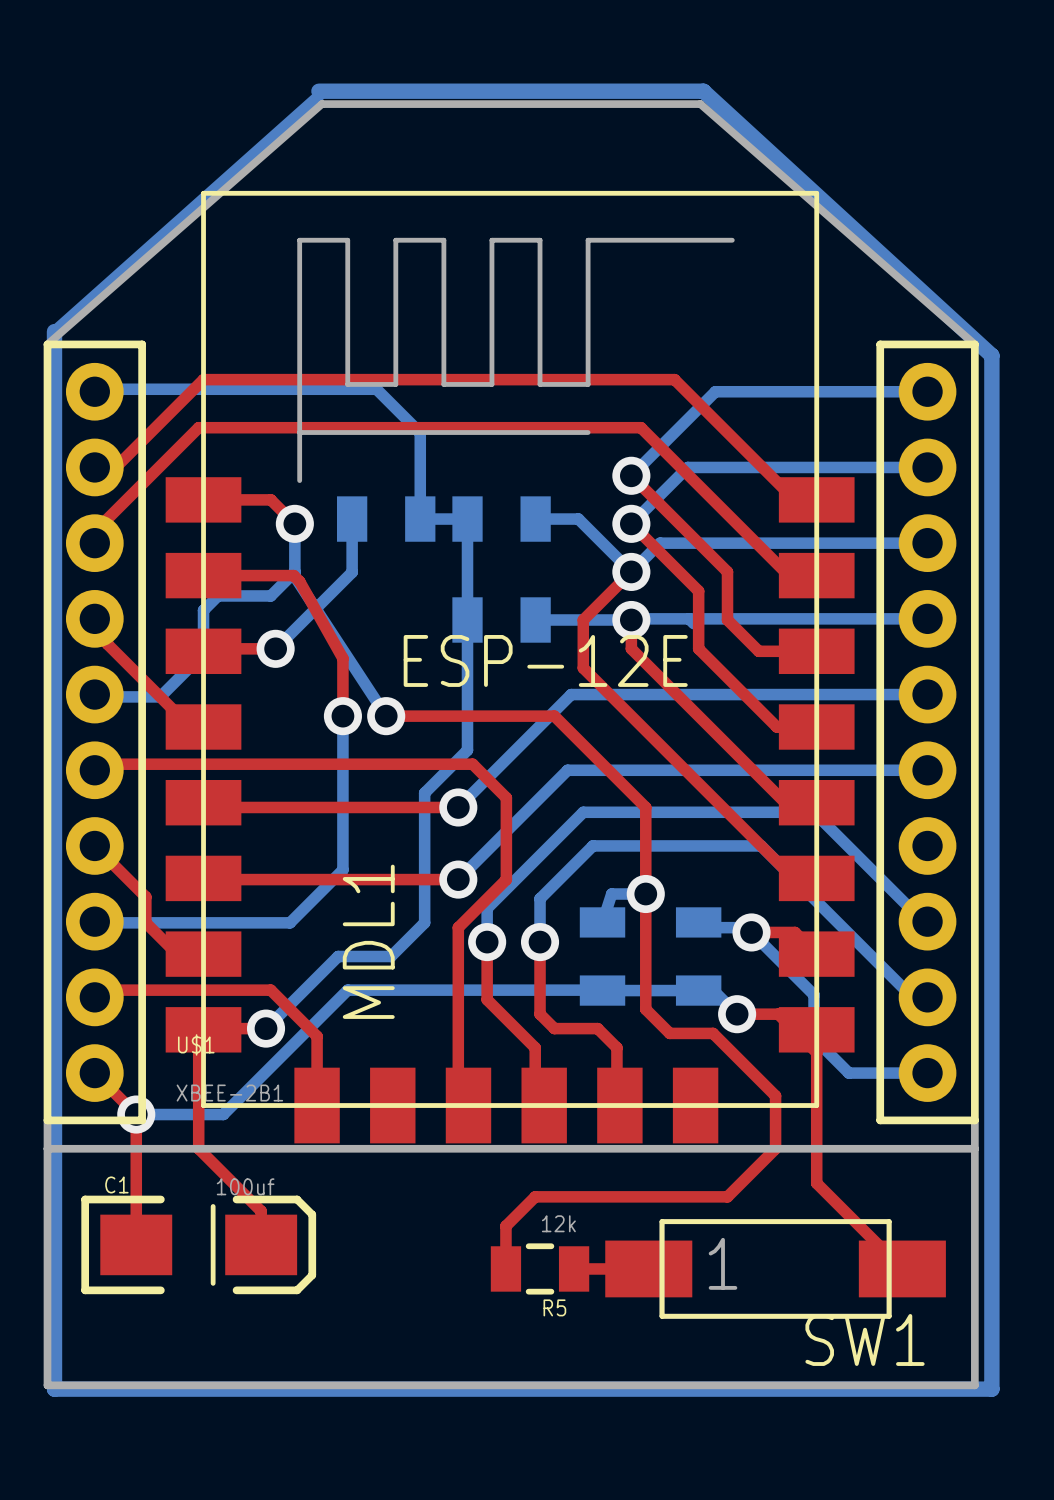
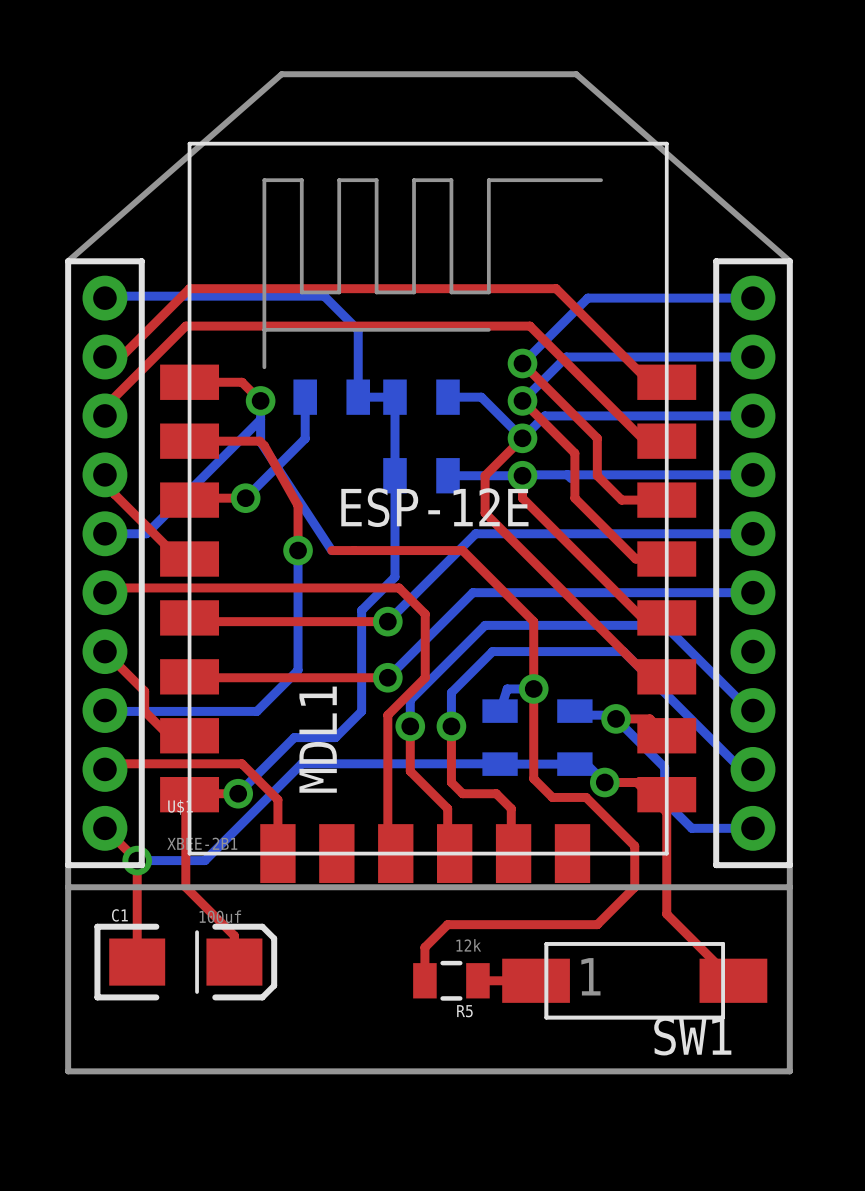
bottom track: (318, 91) (703, 91) (991, 355) (991, 1389) (54, 1389) (54, 331) (318, 96) -> none
bottom track: (294, 571) (270, 595) (217, 595) (203, 610) (203, 653) (160, 696) (97, 696) (94, 694) -> (260, 419) (146, 533) (104, 533)
via: (386, 716) -> none

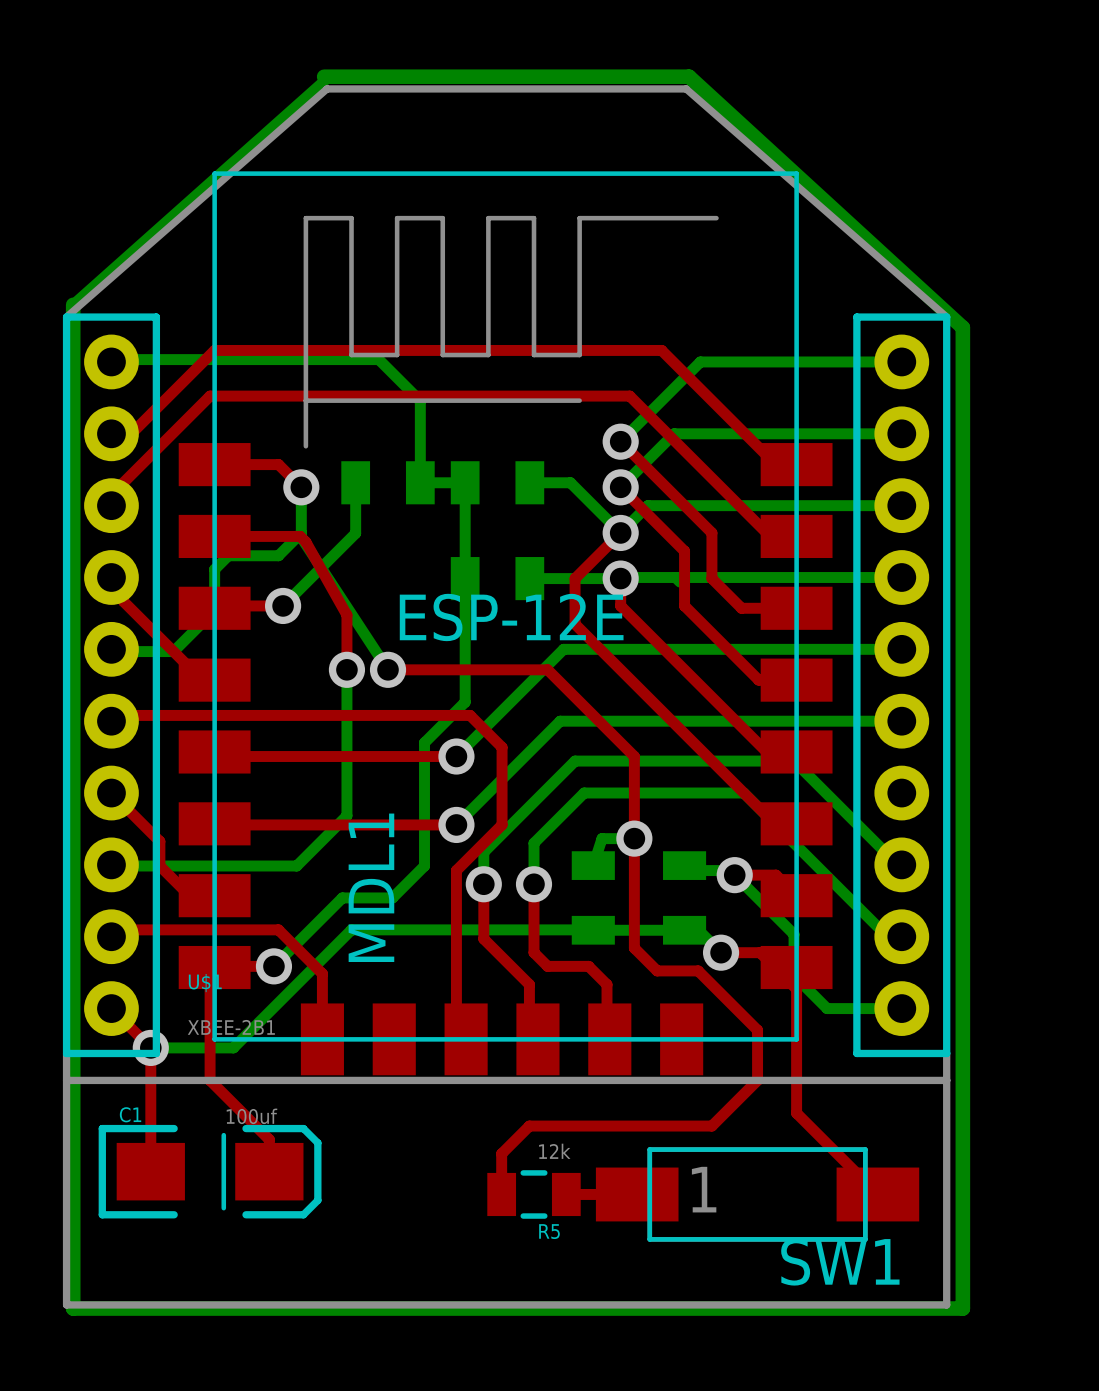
bottom track: none -> (324, 76) (689, 76) (962, 327) (962, 1308) (73, 1308) (73, 304) (324, 81)
bottom track: (260, 419) (146, 533) (104, 533) -> (301, 532) (278, 555) (228, 555) (214, 569) (214, 610) (173, 651) (113, 651) (111, 649)
via: none -> (388, 669)

